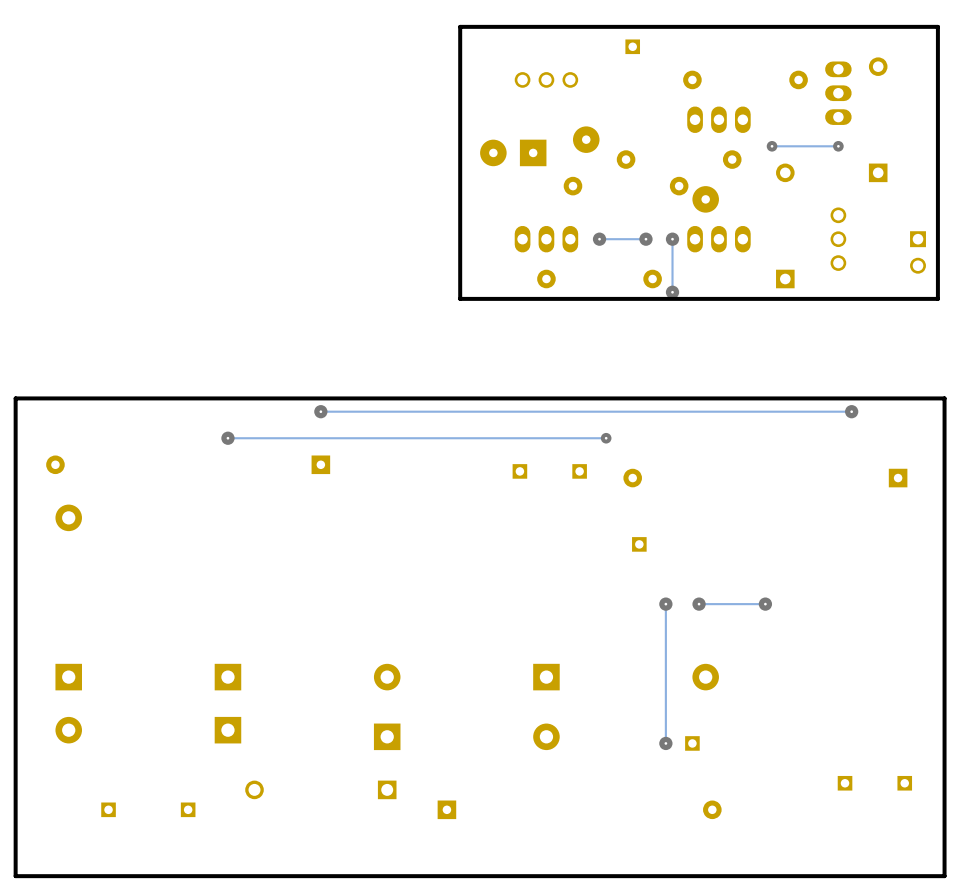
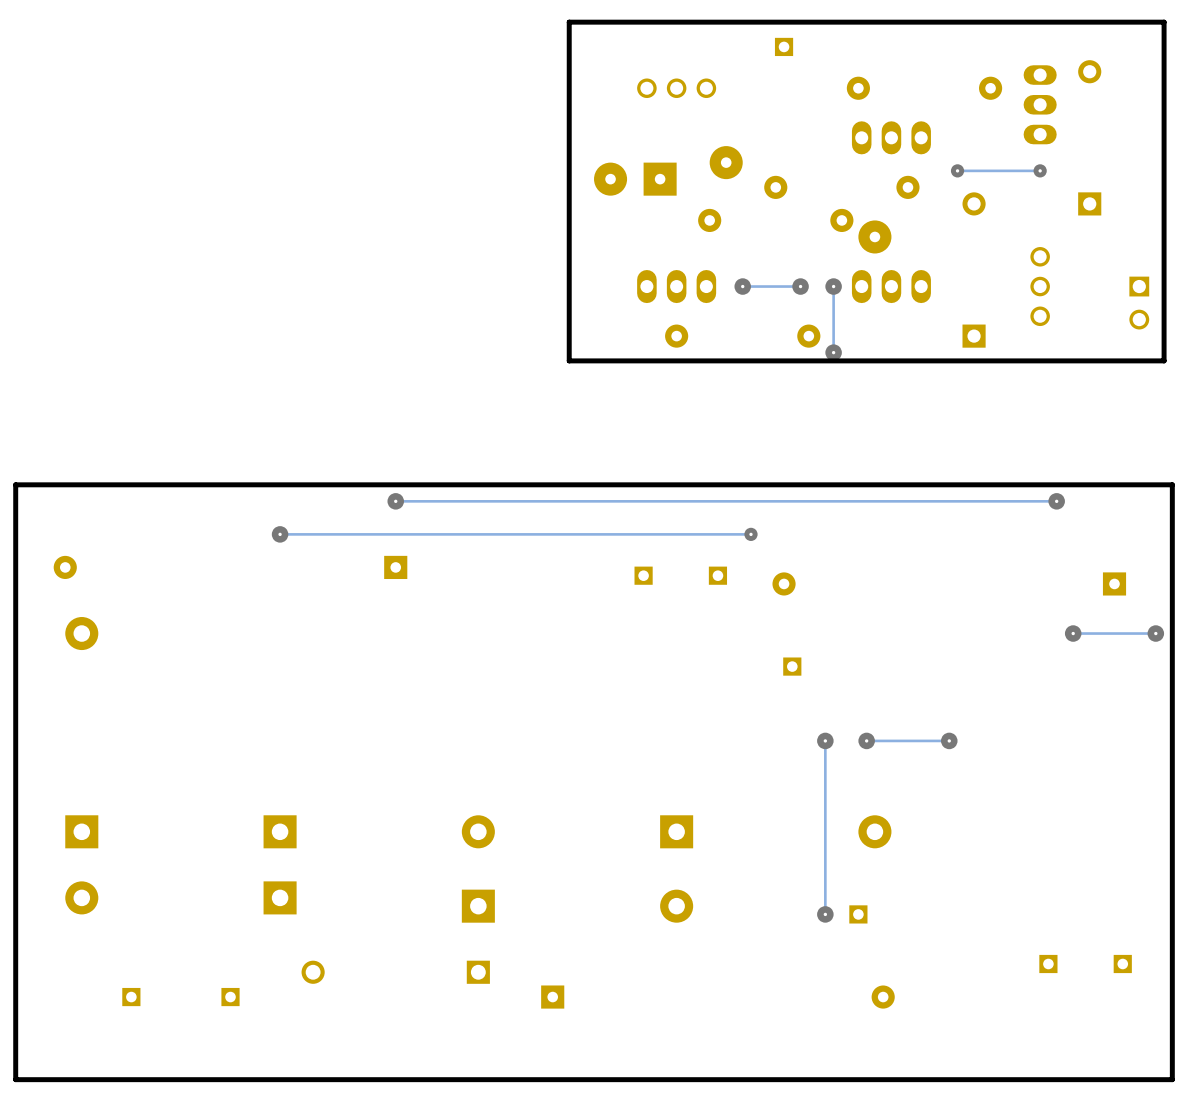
via: none -> (1073, 633)
track: none -> (1155, 633) (1073, 633)
via: none -> (1155, 633)

